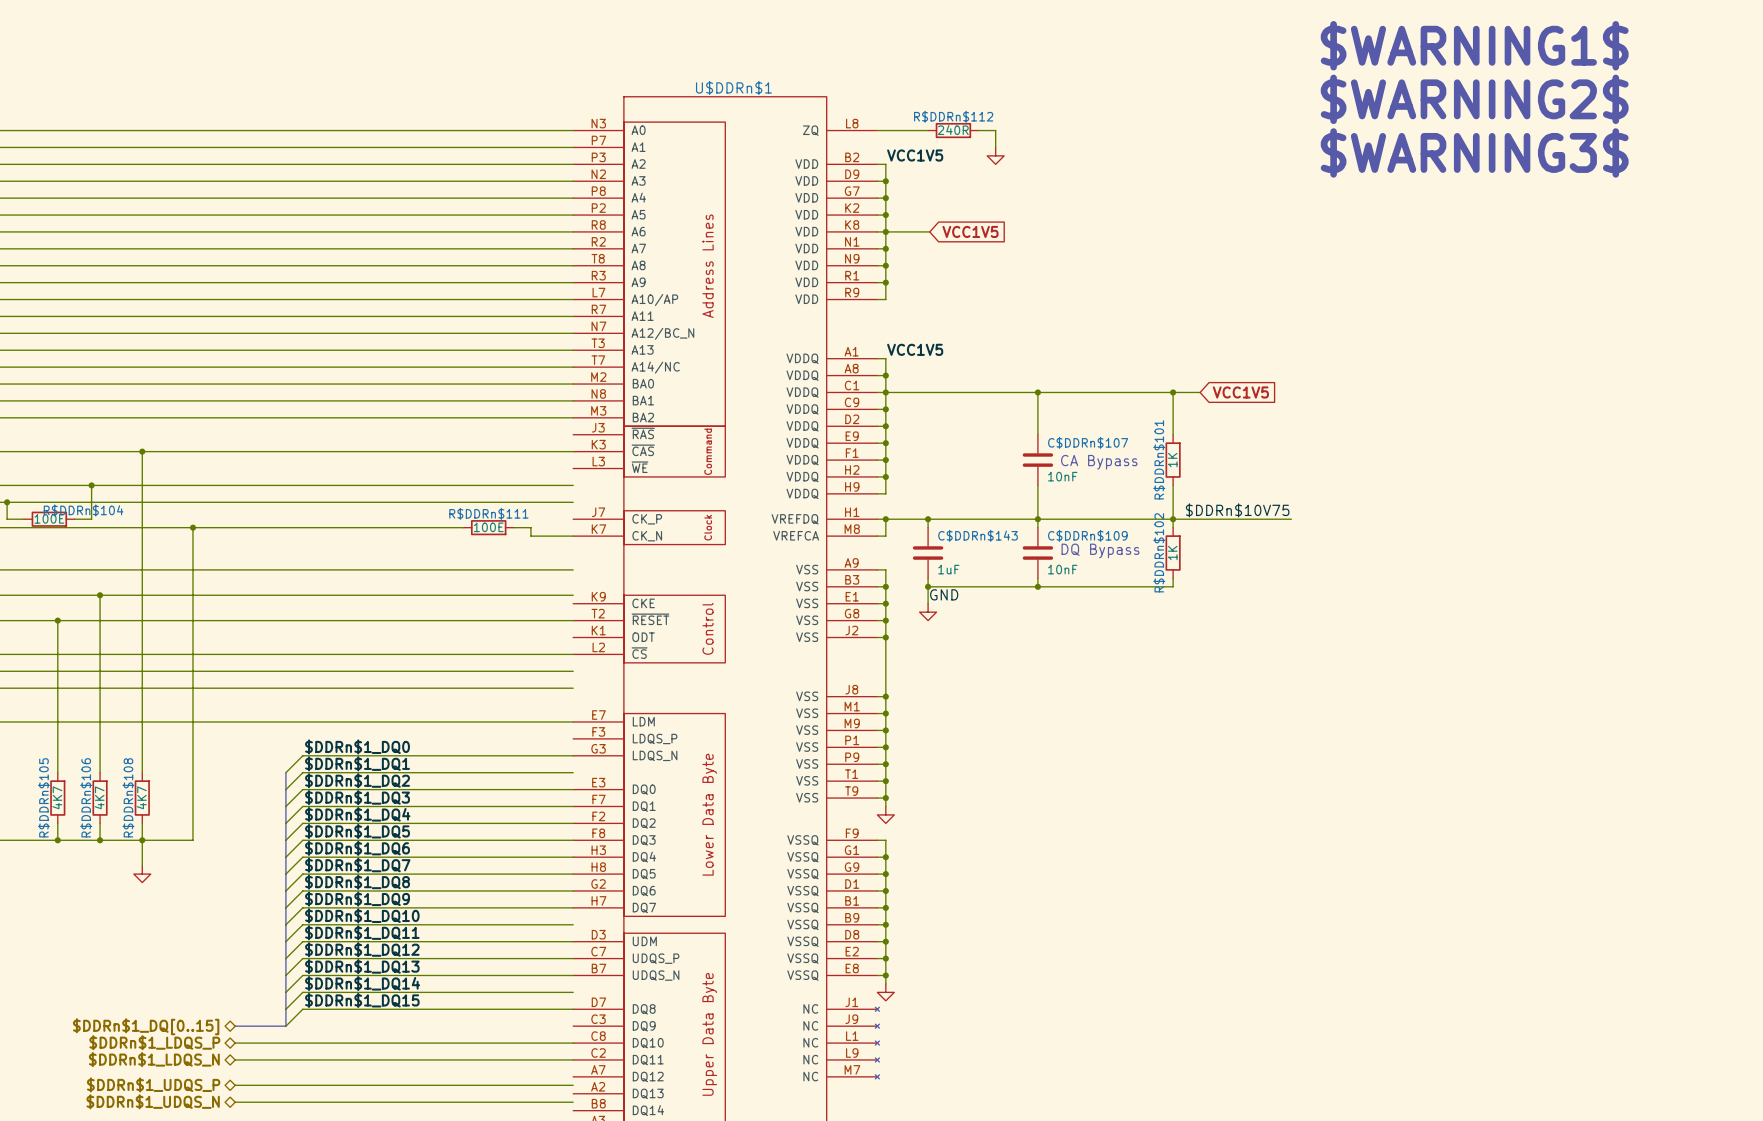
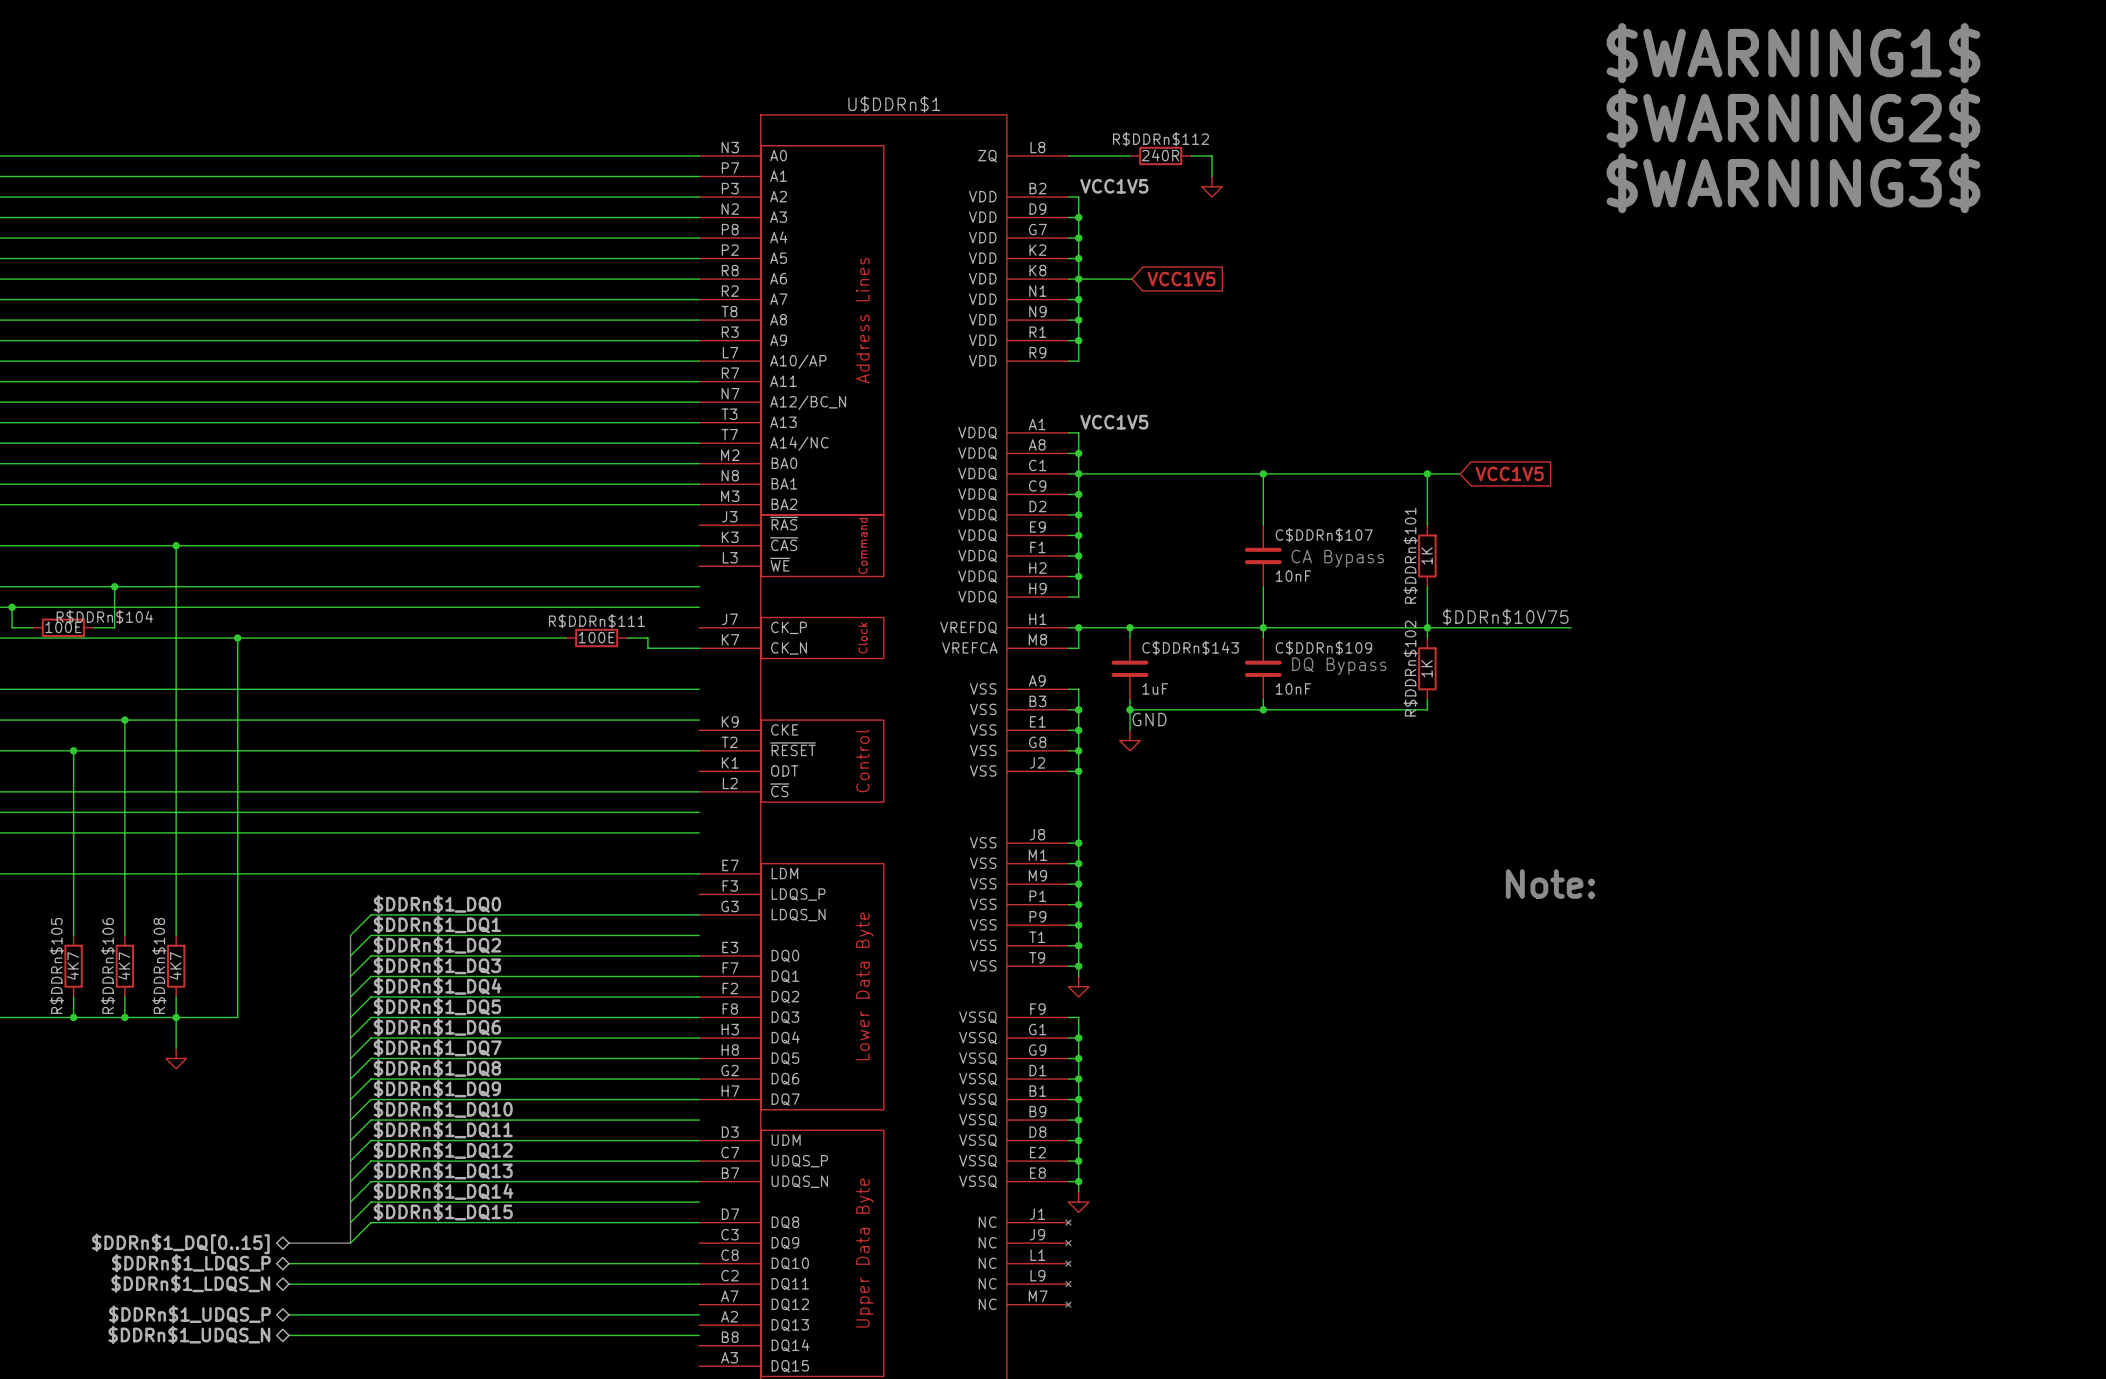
text: none -> Note: (1550, 884)

